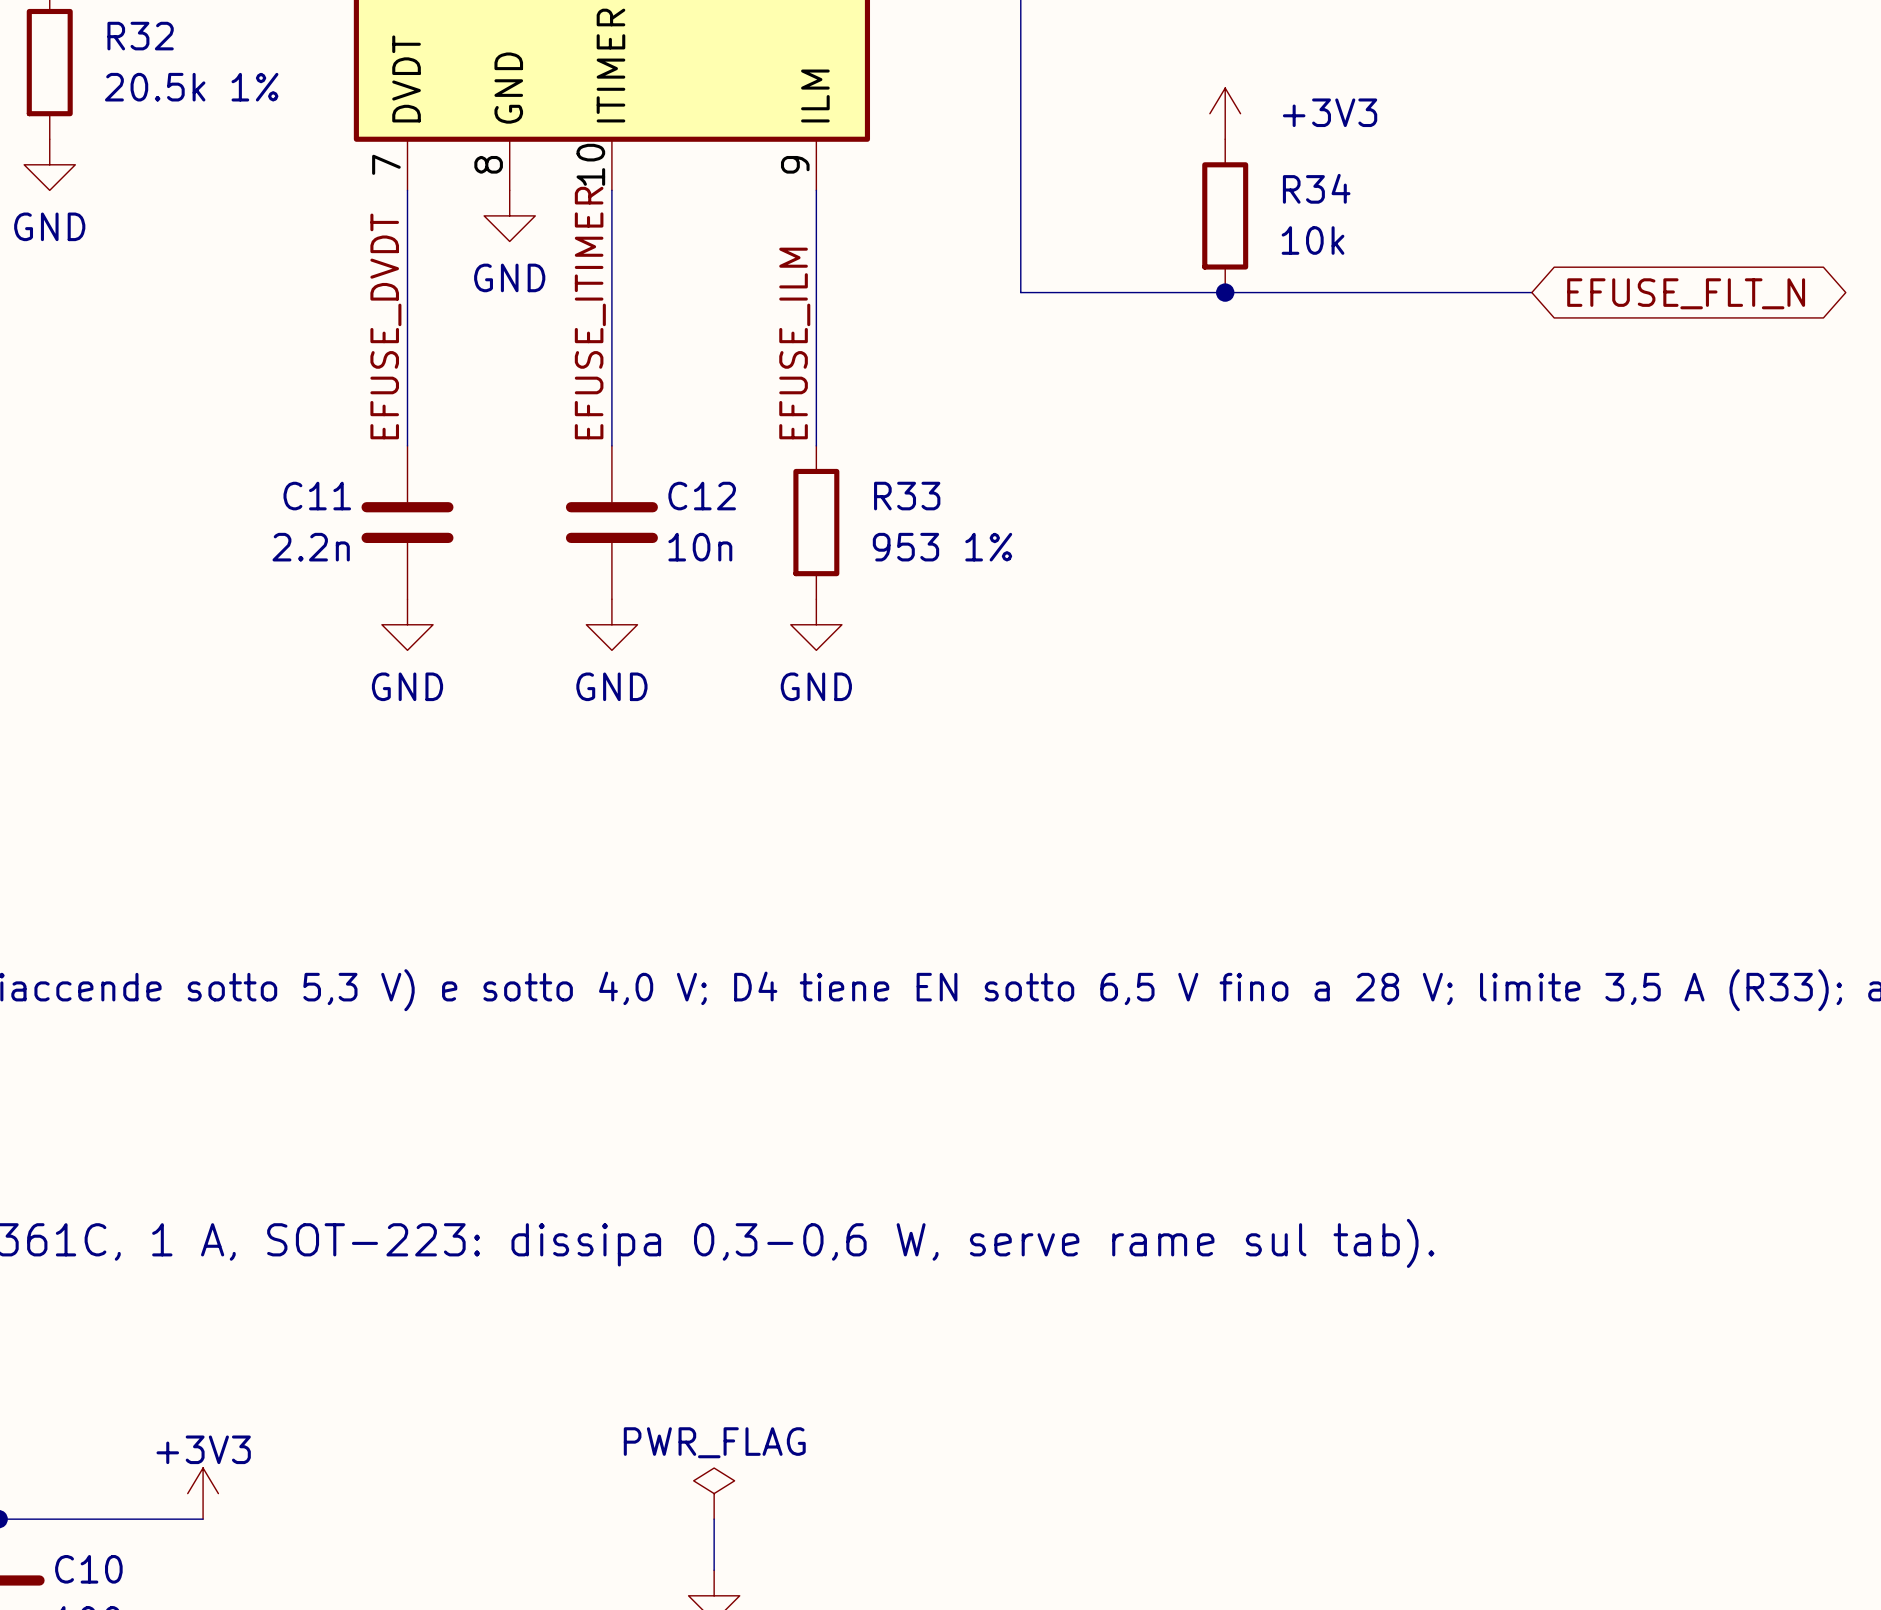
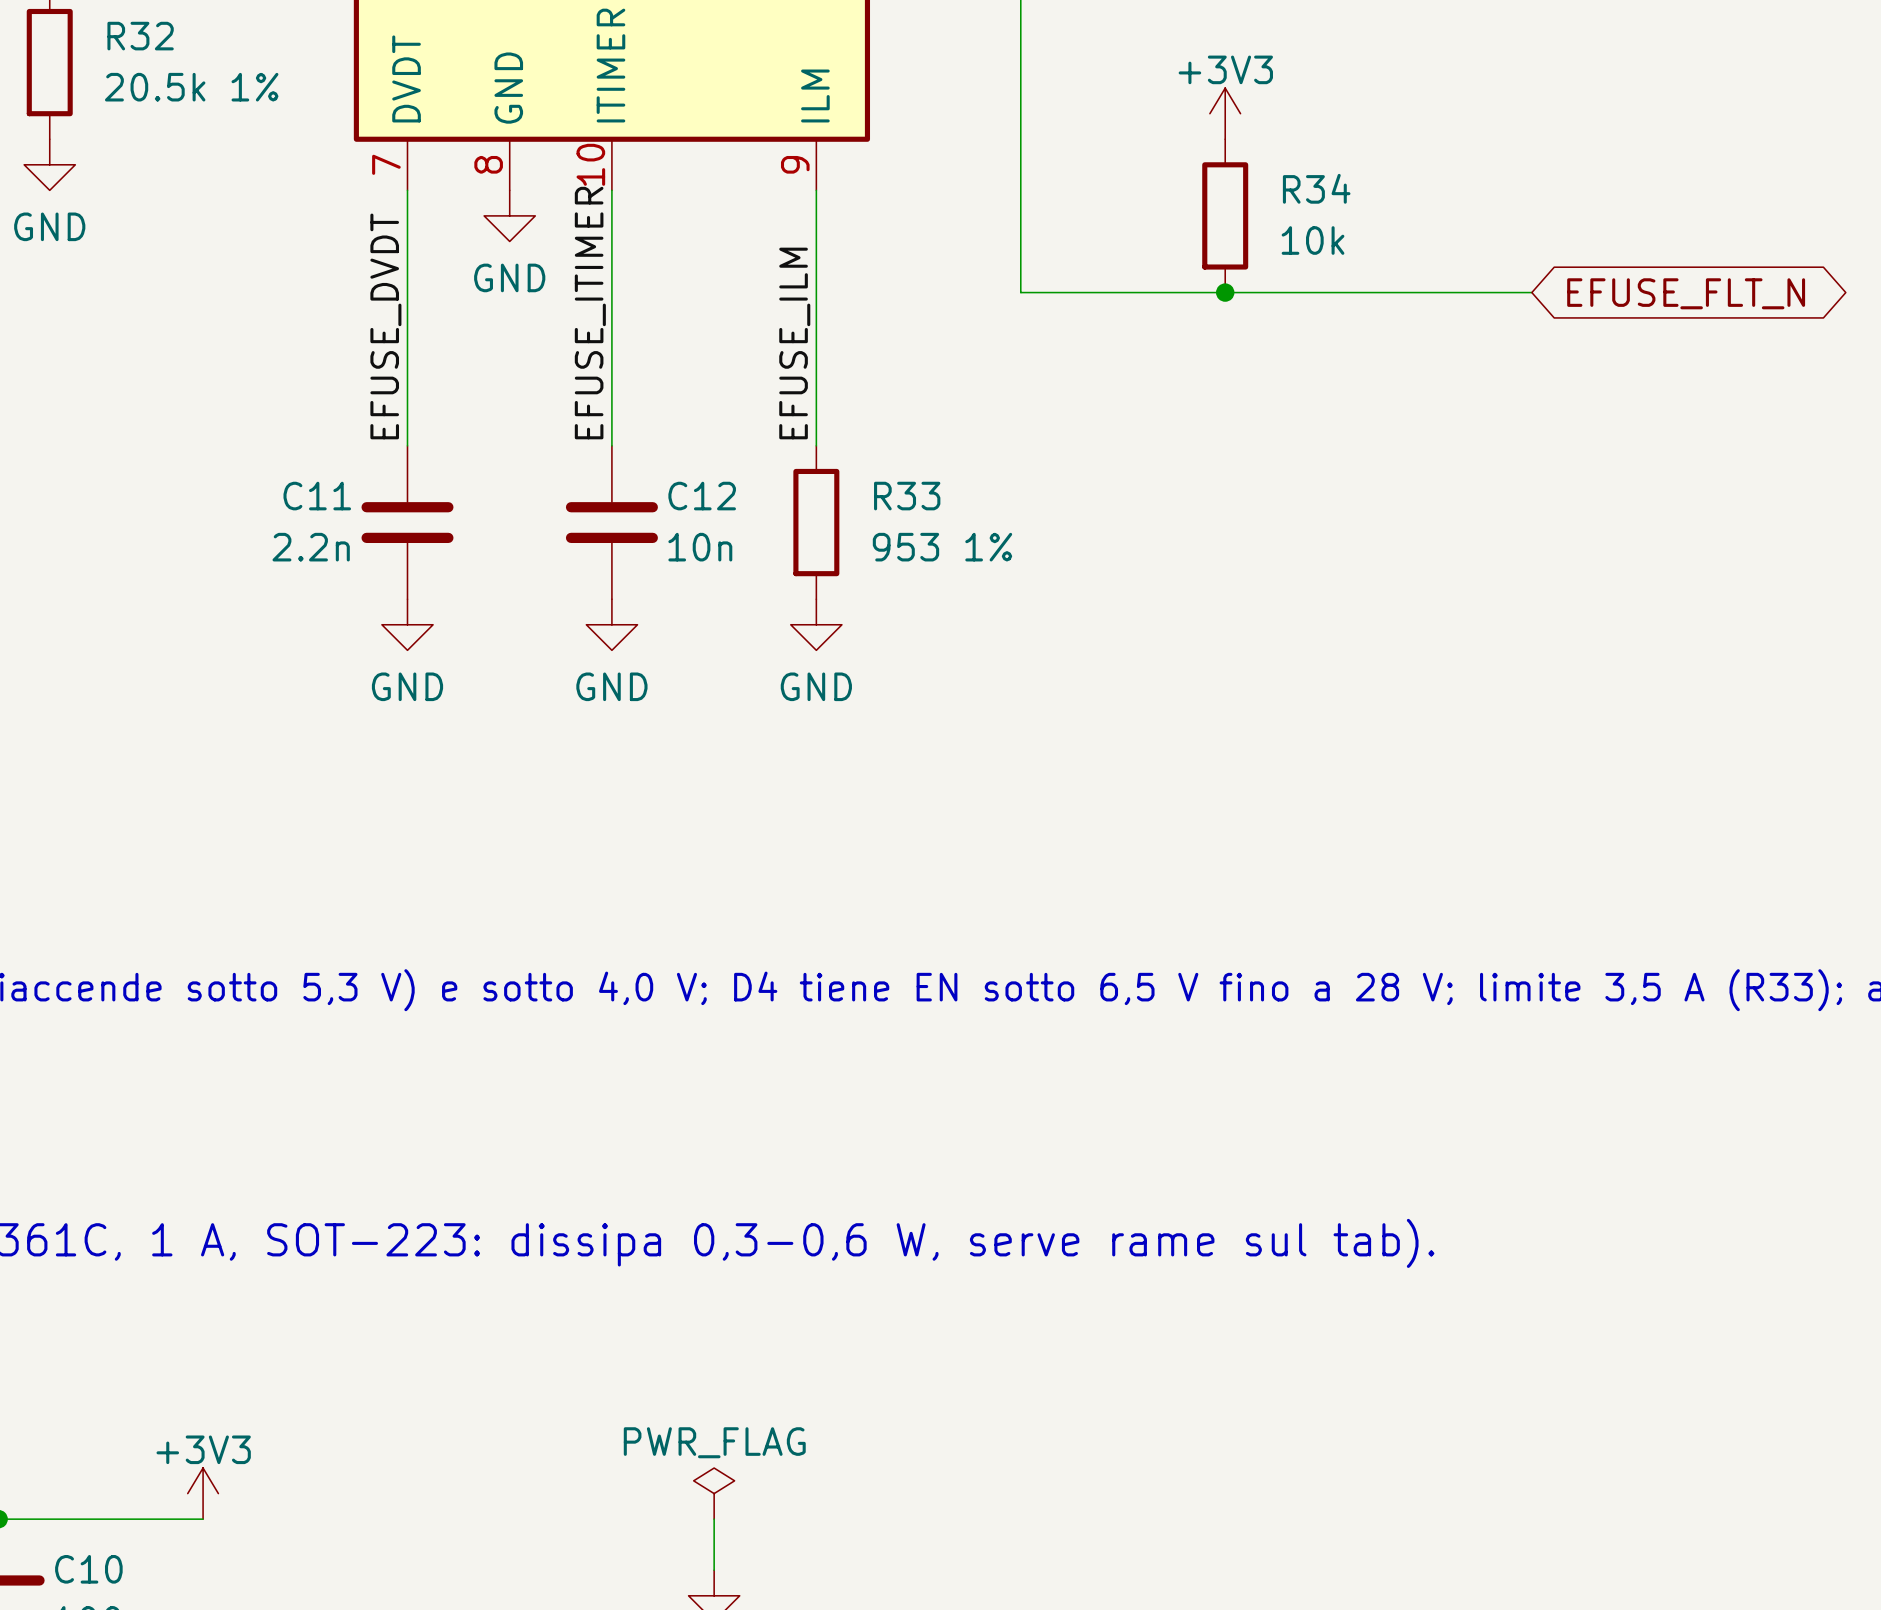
power symbol text position: +3V3 (1330, 112) -> +3V3 (1225, 69)

